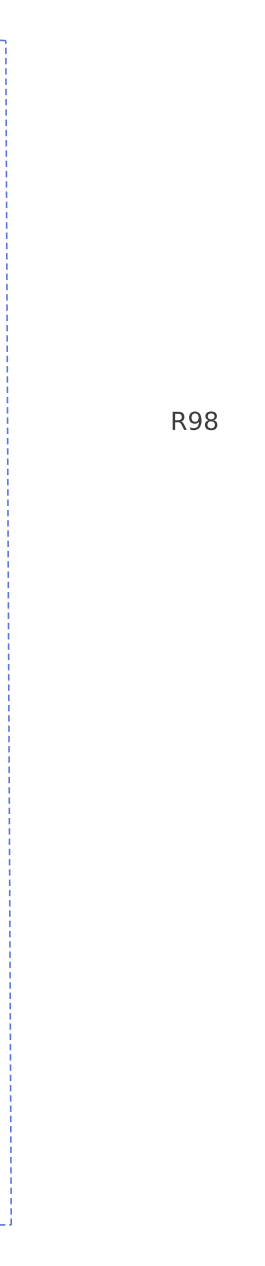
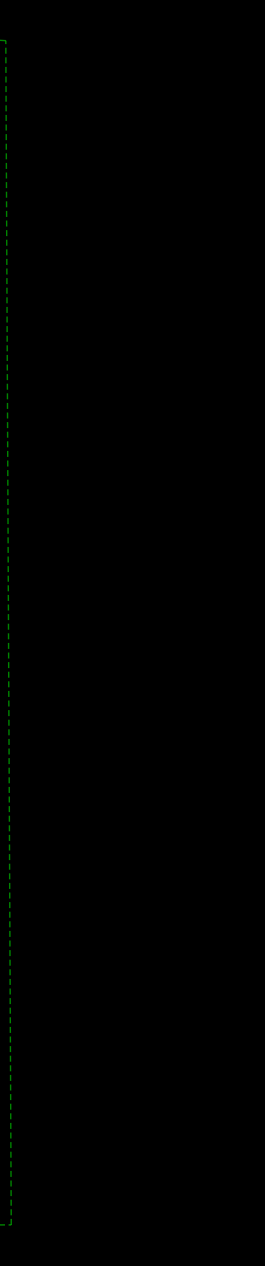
R98: (195, 420) -> none

